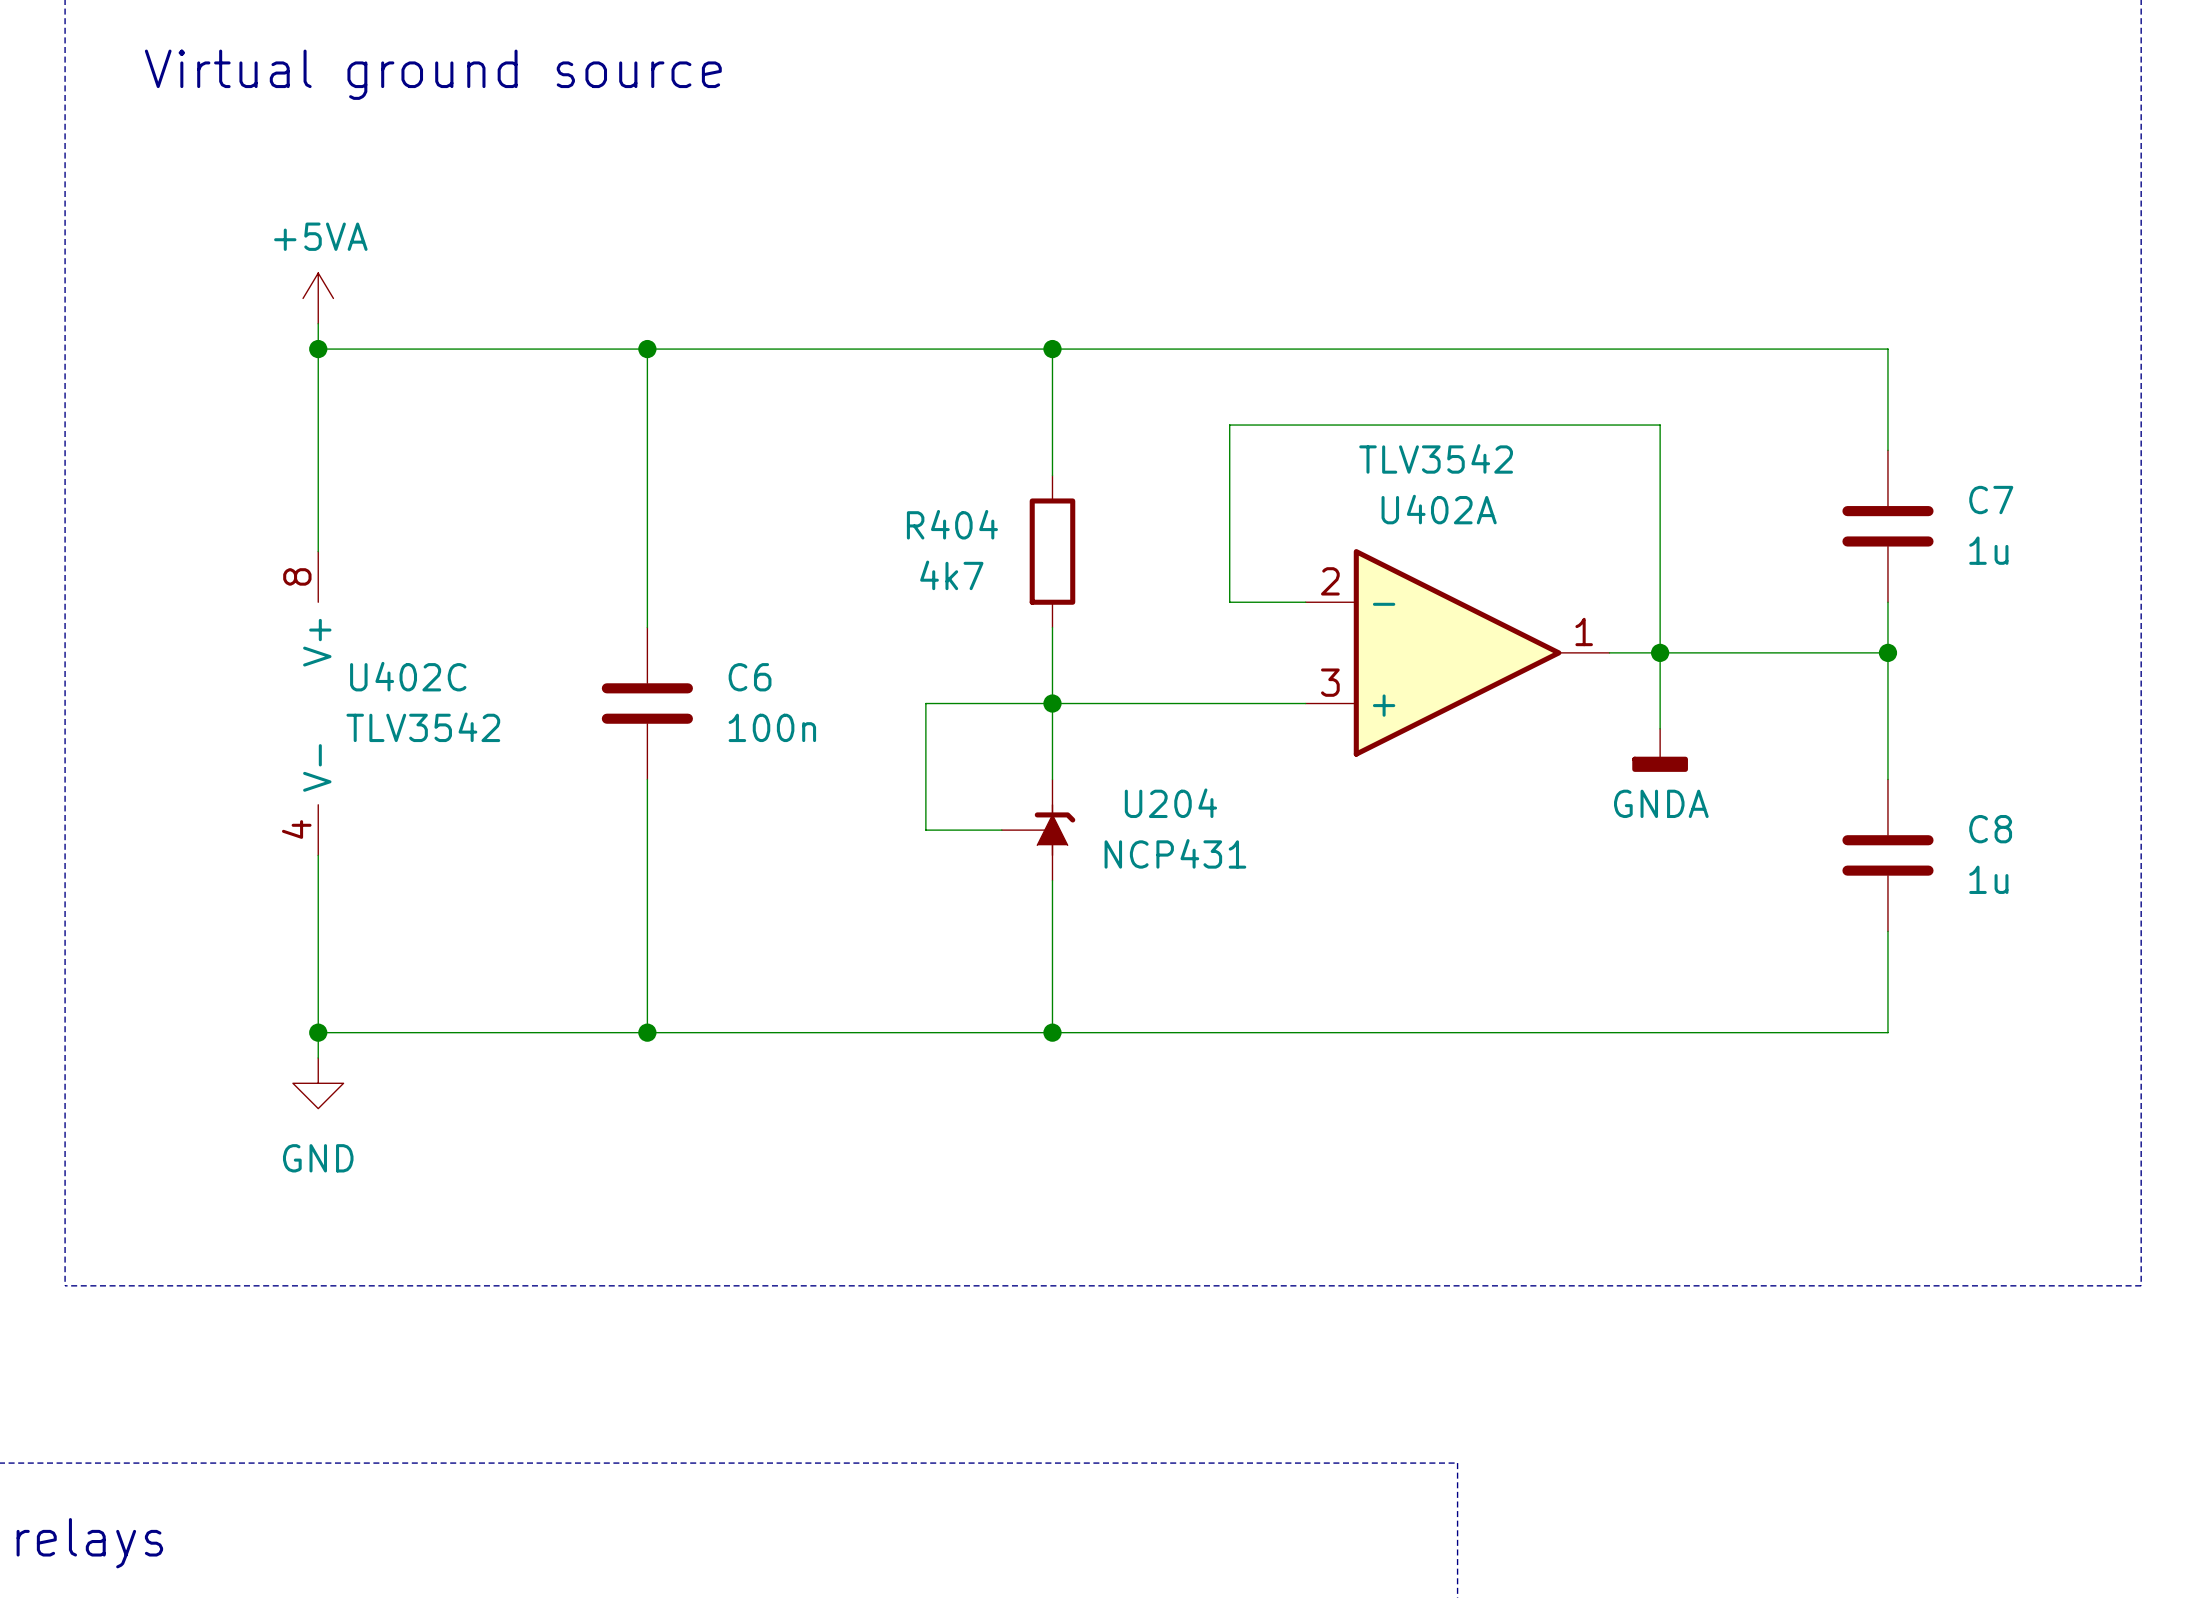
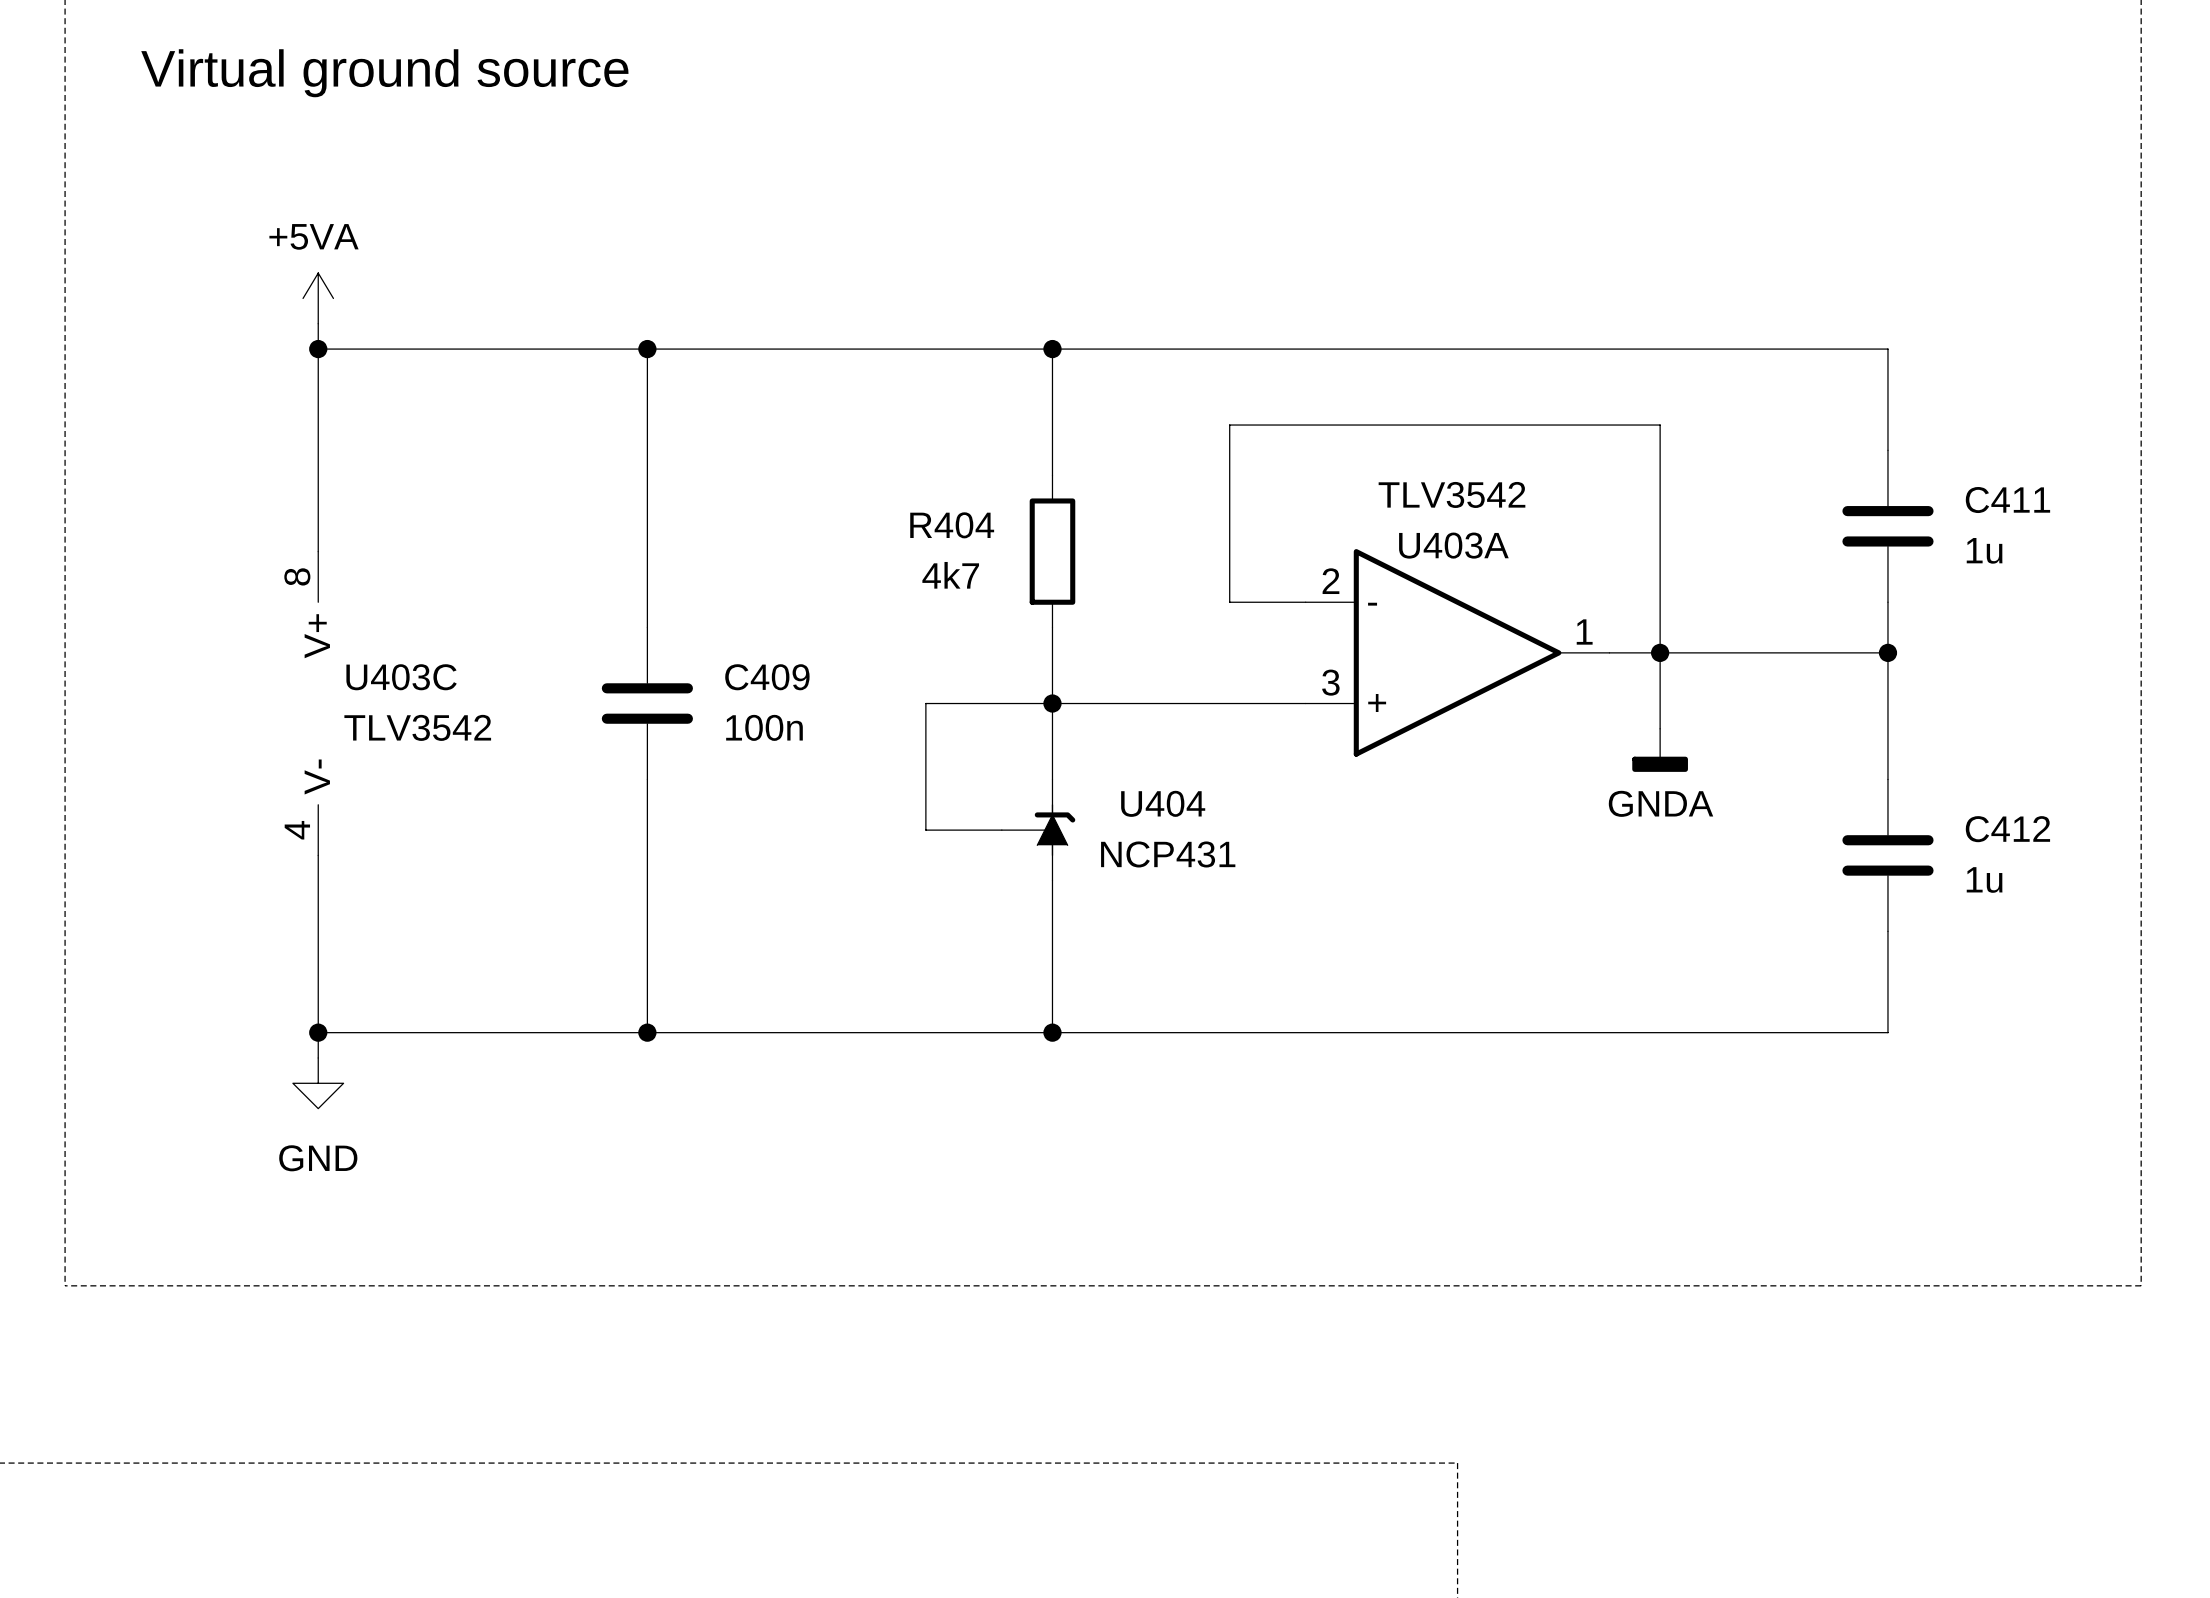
U402A value position: TLV3542 (1436, 458) -> TLV3542 (1452, 494)
C7 name: C7 (1991, 500) -> C411 (2007, 500)
U402A name: U402A (1439, 509) -> U403A (1453, 545)
U402C name: U402C (408, 676) -> U403C (401, 677)
C6 name: C6 (750, 677) -> C409 (767, 677)
U204 name: U204 (1170, 803) -> U404 (1163, 803)
C8 name: C8 (1990, 829) -> C412 (2007, 829)

